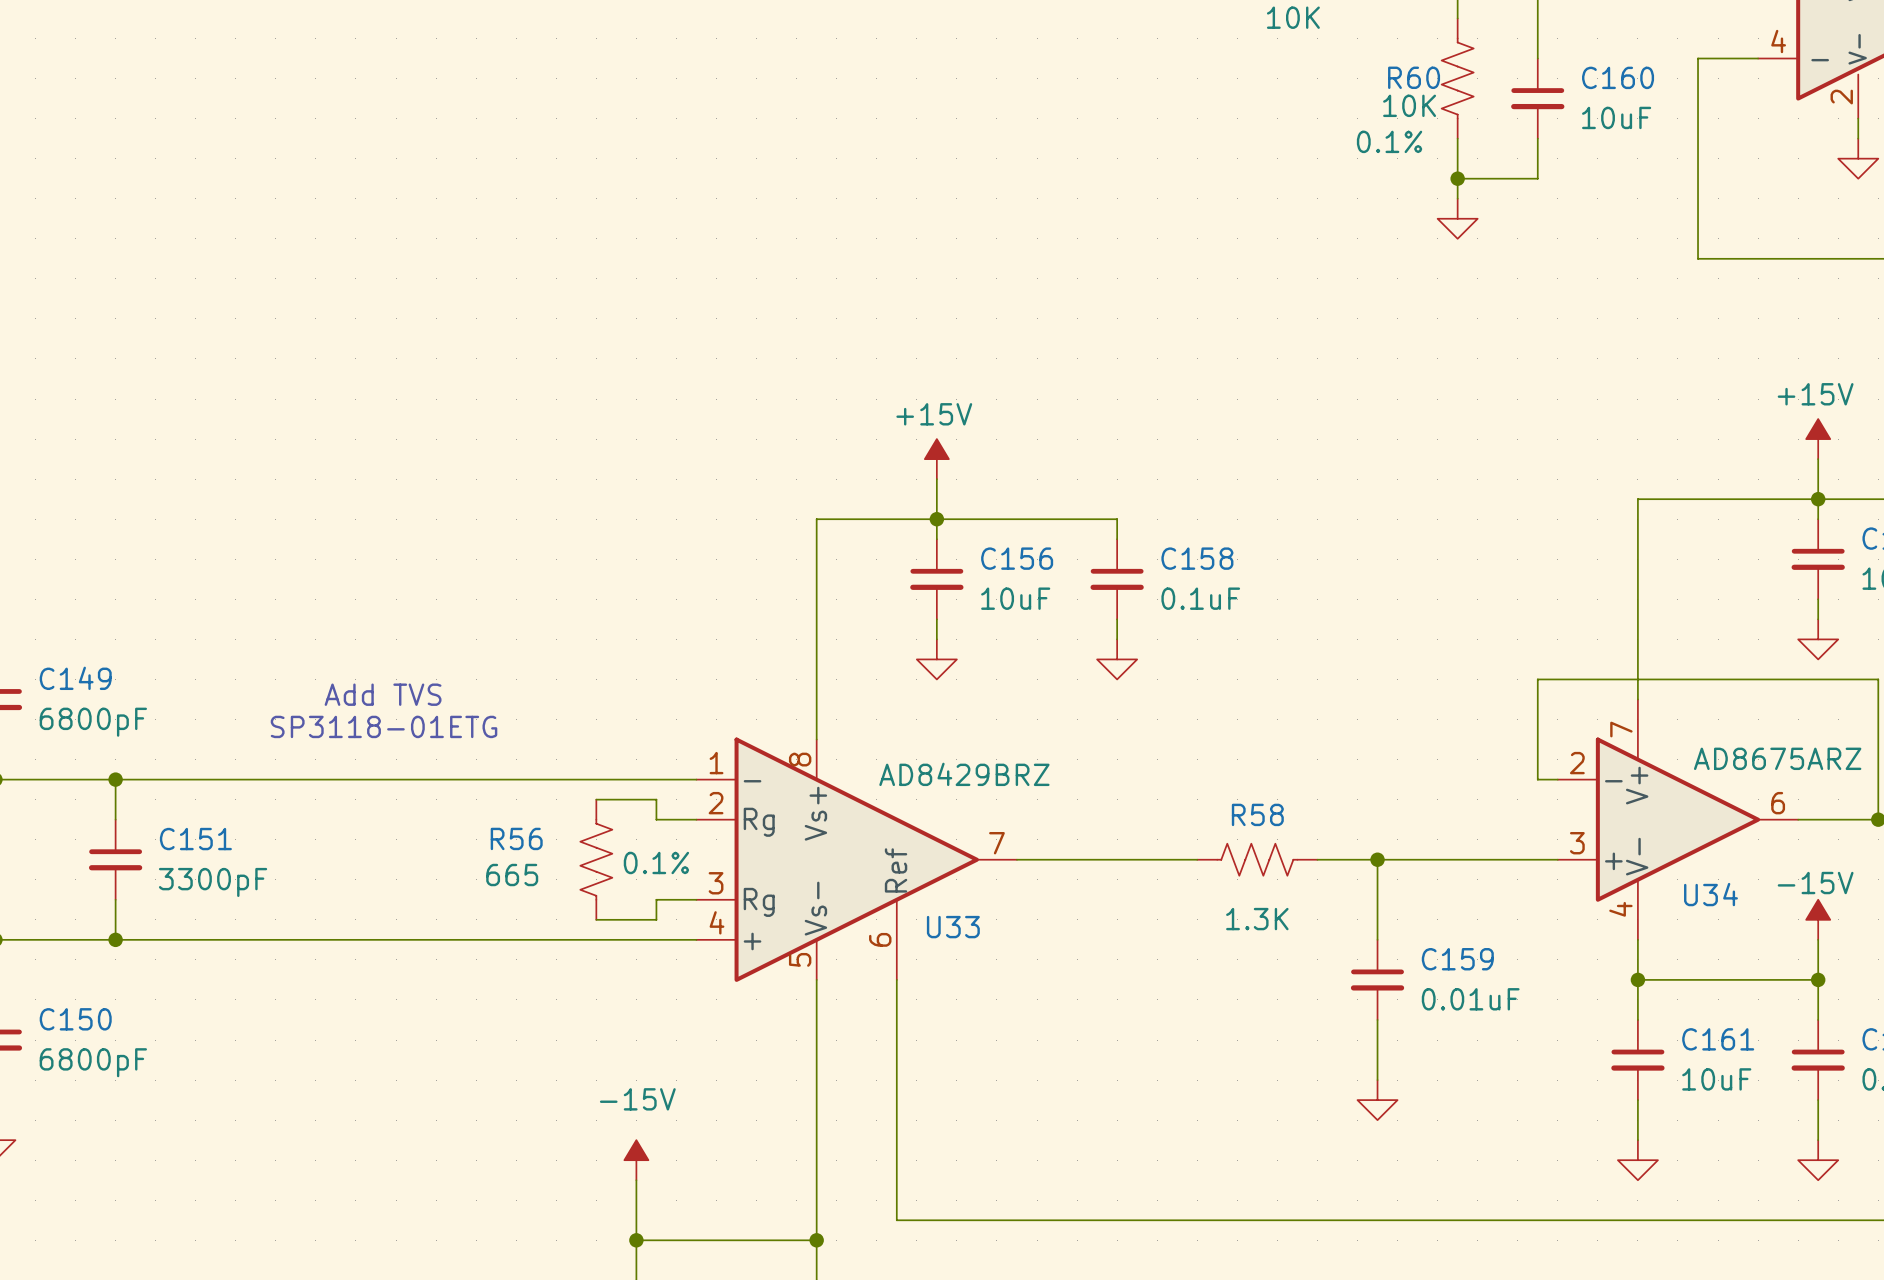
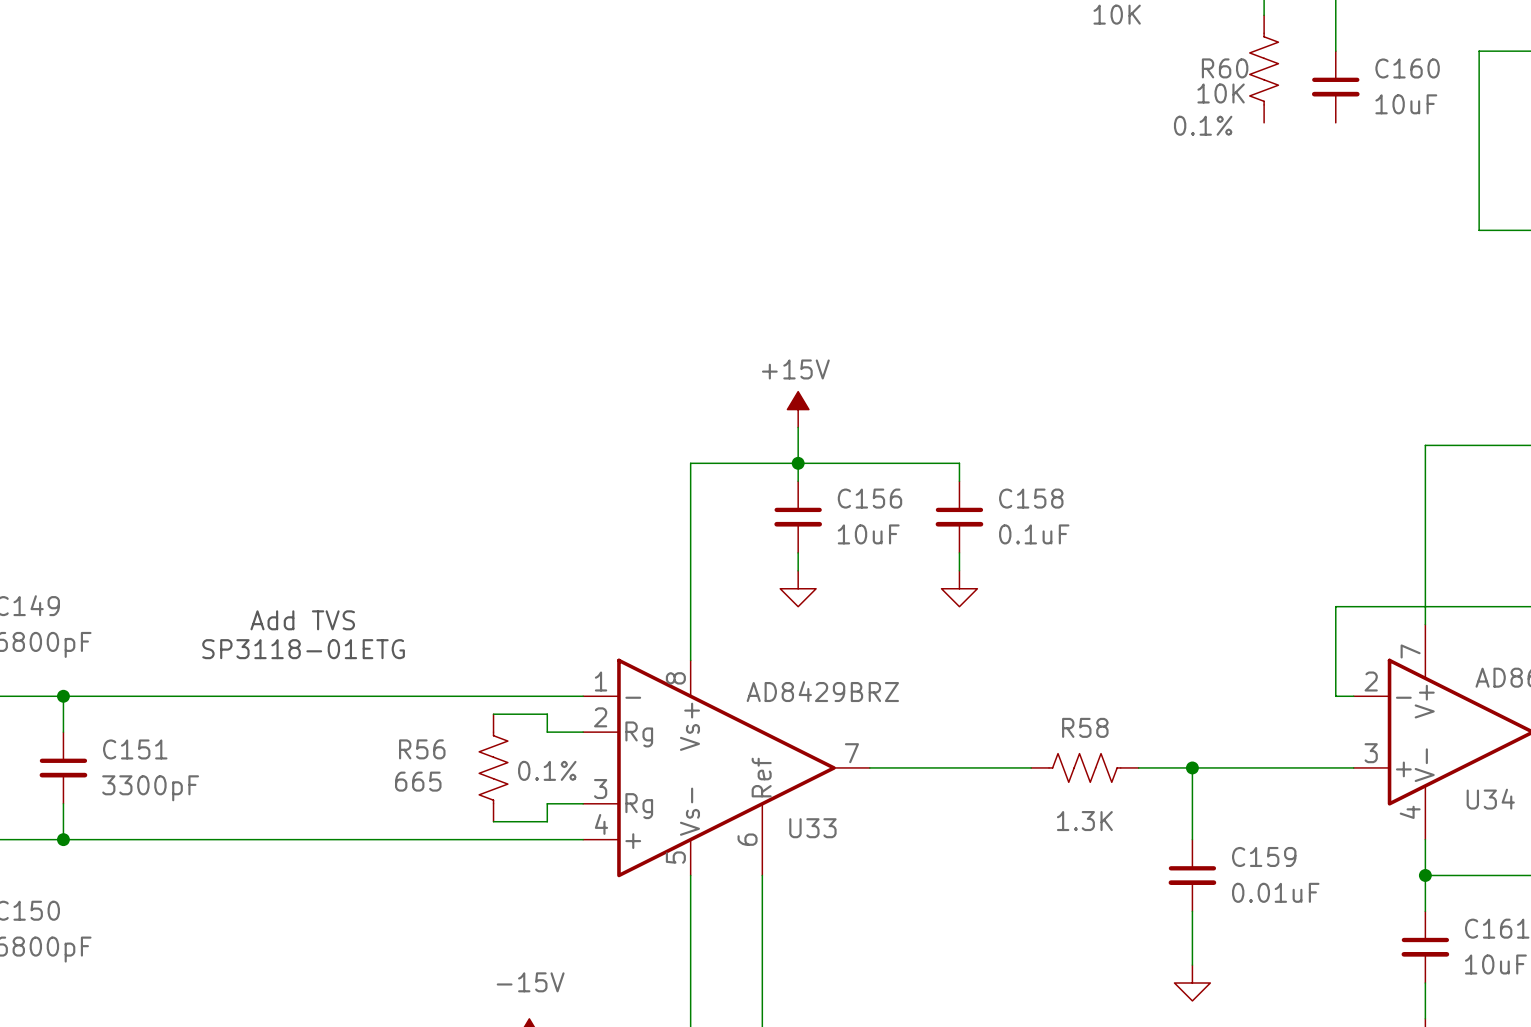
wire: (1457, 138) (1457, 198) -> none
wire: (1537, 138) (1537, 178) (1457, 178) -> none
junction: (1457, 178) -> none
power symbol: (1457, 218) -> none

